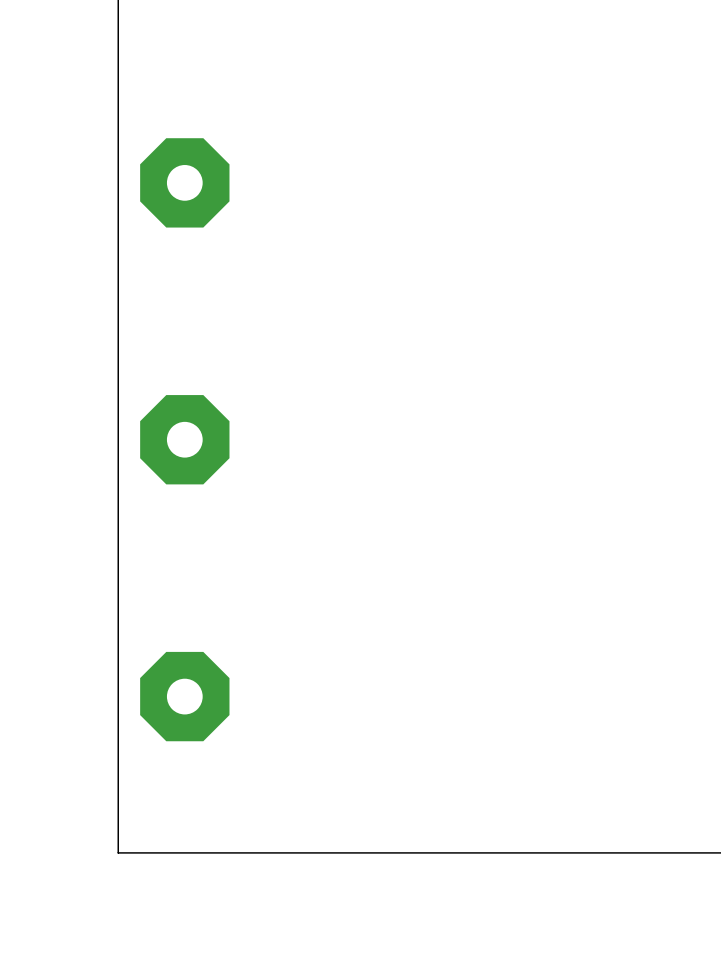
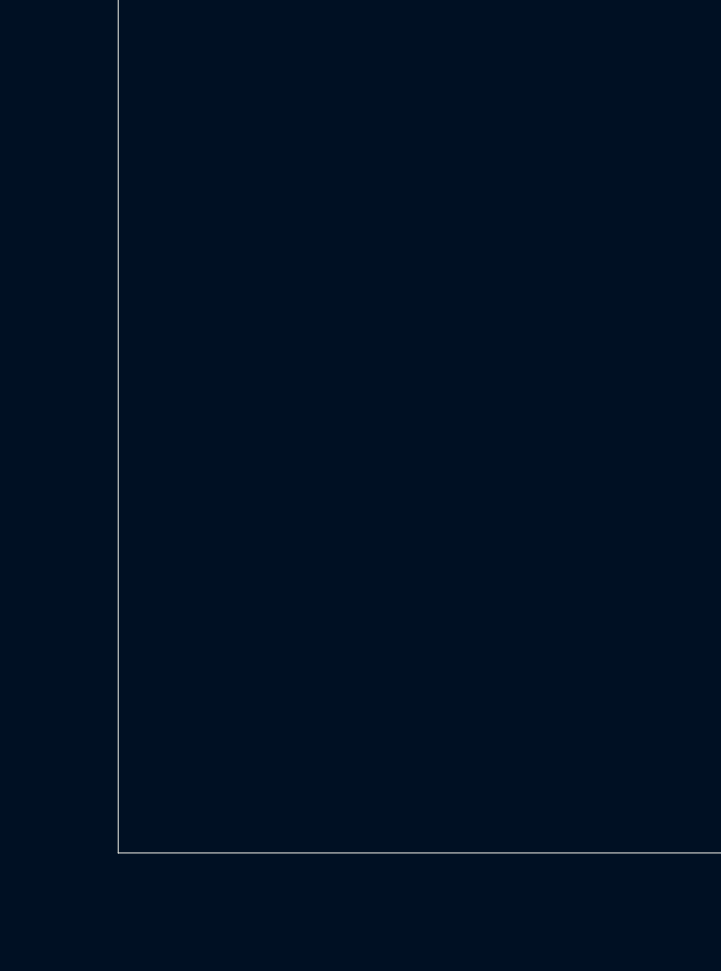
part: (184, 182) -> none
part: (184, 439) -> none
part: (184, 696) -> none

